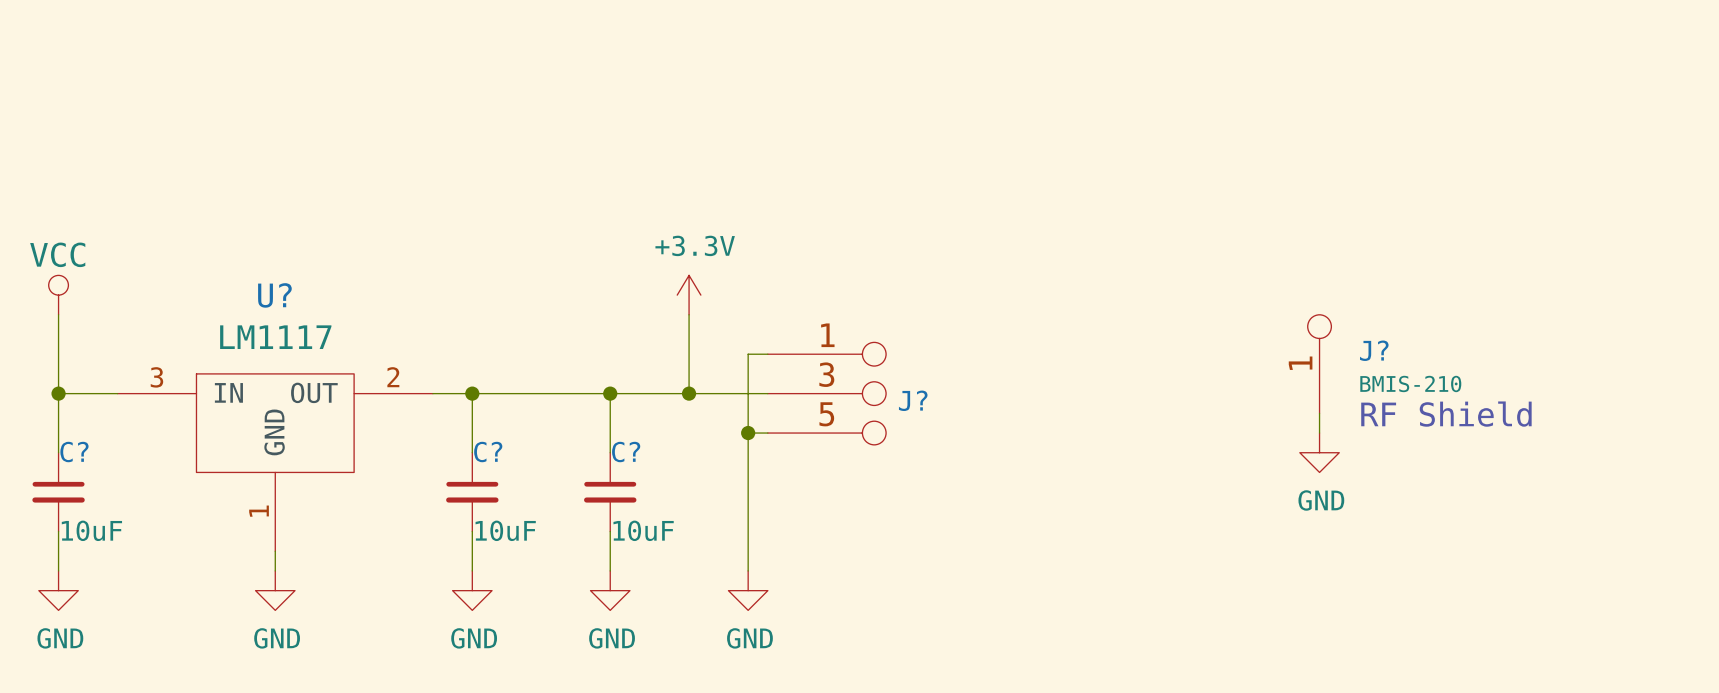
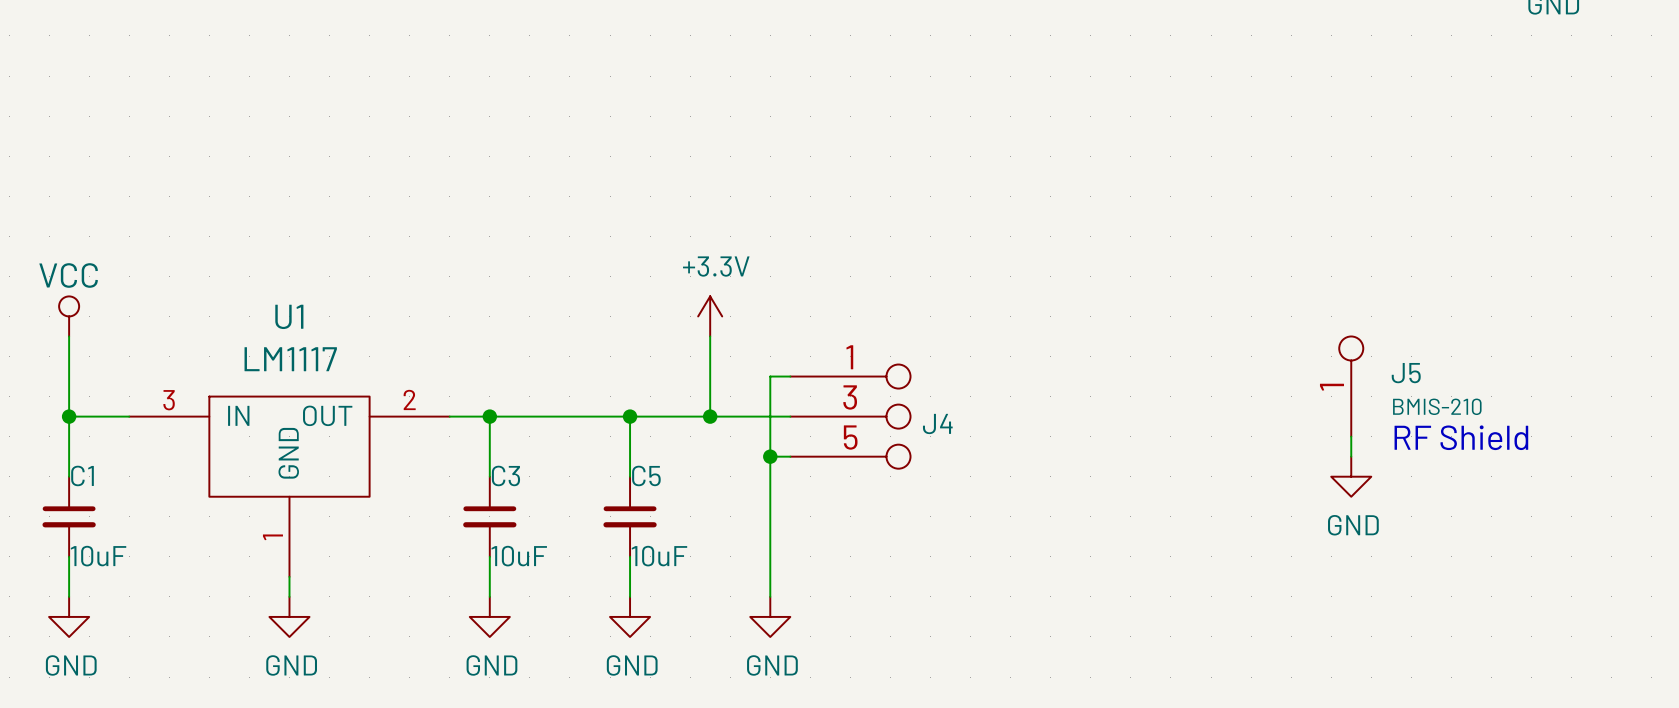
U? name: U? (274, 295) -> U1 (289, 316)
J? name: J? (1374, 350) -> J5 (1406, 373)
J? name: J? (913, 400) -> J4 (937, 423)
C? name: C? (74, 452) -> C1 (82, 475)
C? name: C? (488, 452) -> C3 (505, 475)
C? name: C? (626, 452) -> C5 (646, 475)

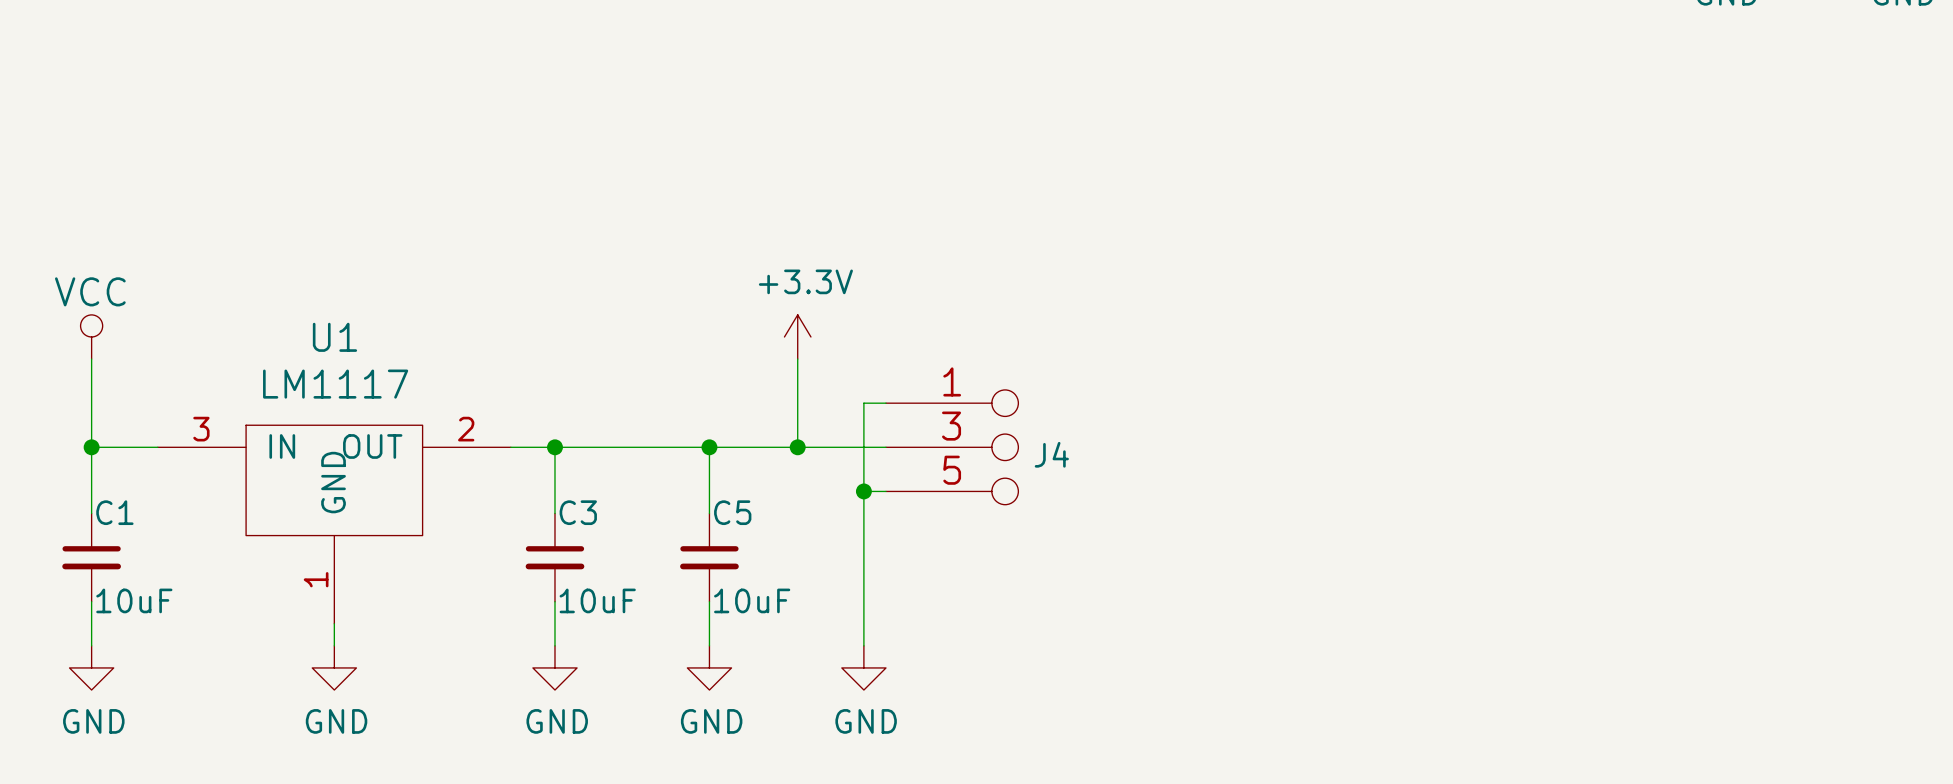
J5: BMIS-210 (1351, 386) -> none
wire: (1351, 436) (1351, 456) -> none
text: RF Shield (1461, 437) -> none
power symbol: GND (1351, 476) -> none

